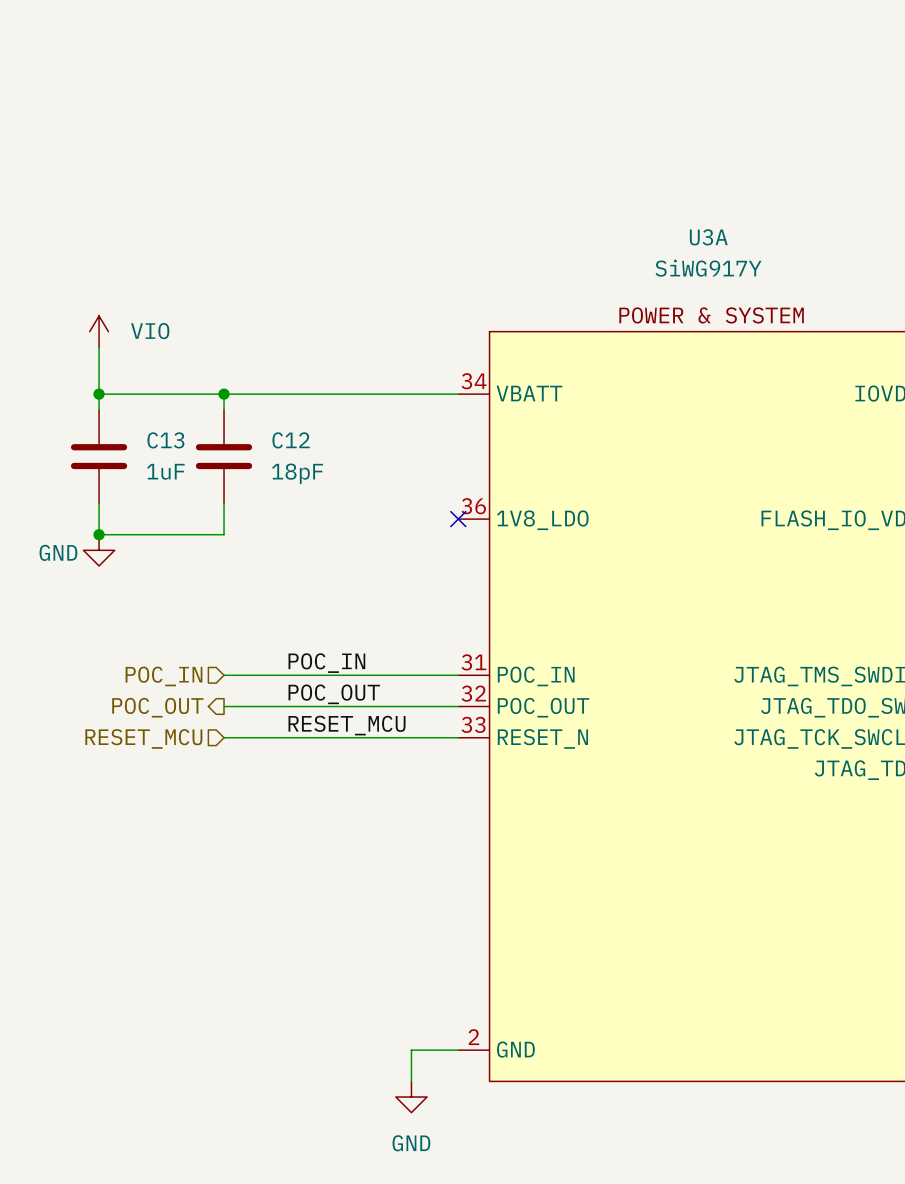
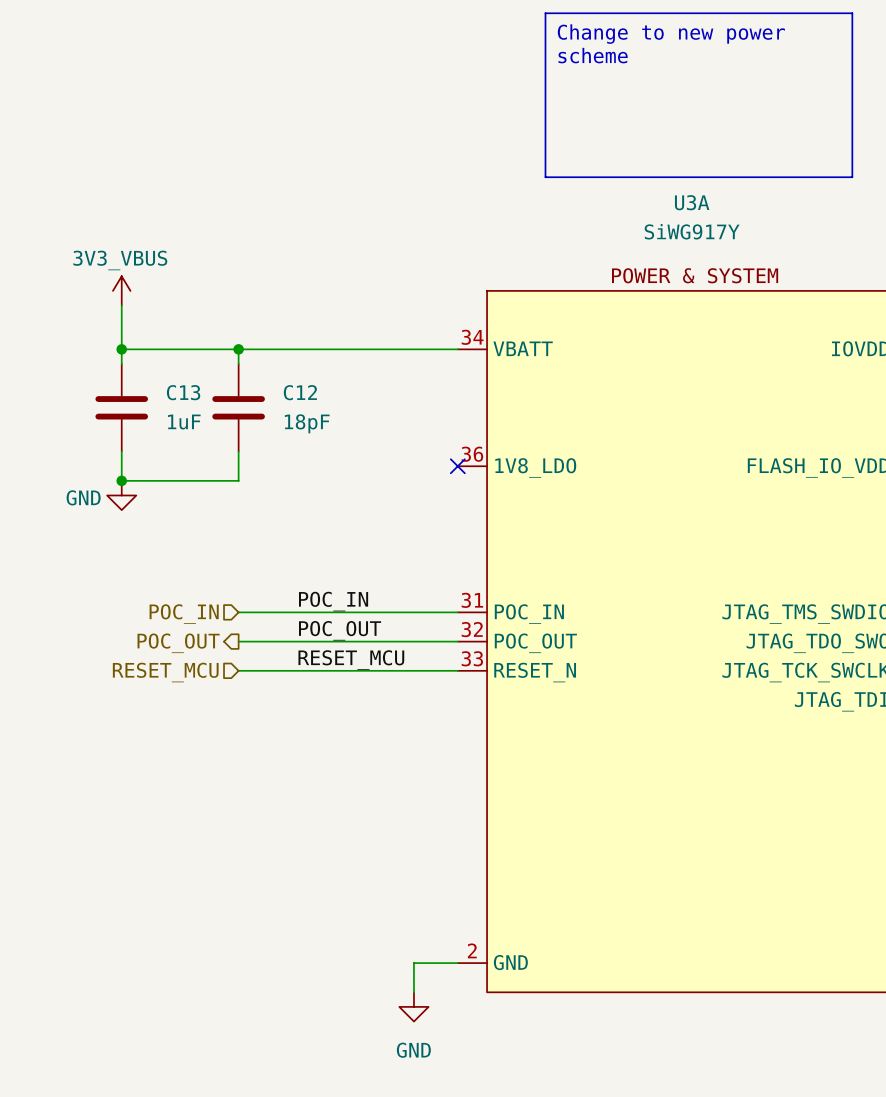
line: none -> (545, 13) (852, 13) (852, 177) (545, 177) (545, 13)
text: none -> Change to new power (671, 34)
text: none -> scheme (593, 55)
power symbol: VIO (99, 331) -> 3V3_VBUS (121, 290)

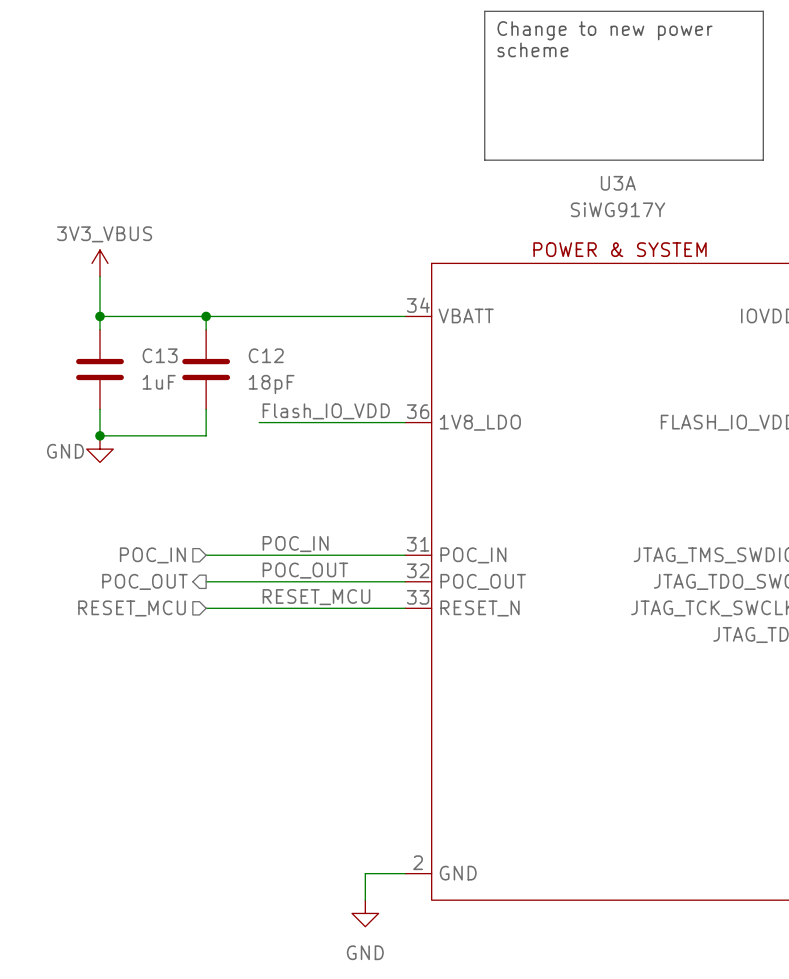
label: none -> Flash_IO_VDD (326, 411)
wire: none -> (259, 422) (405, 422)
no-connect mark: (457, 466) -> none

